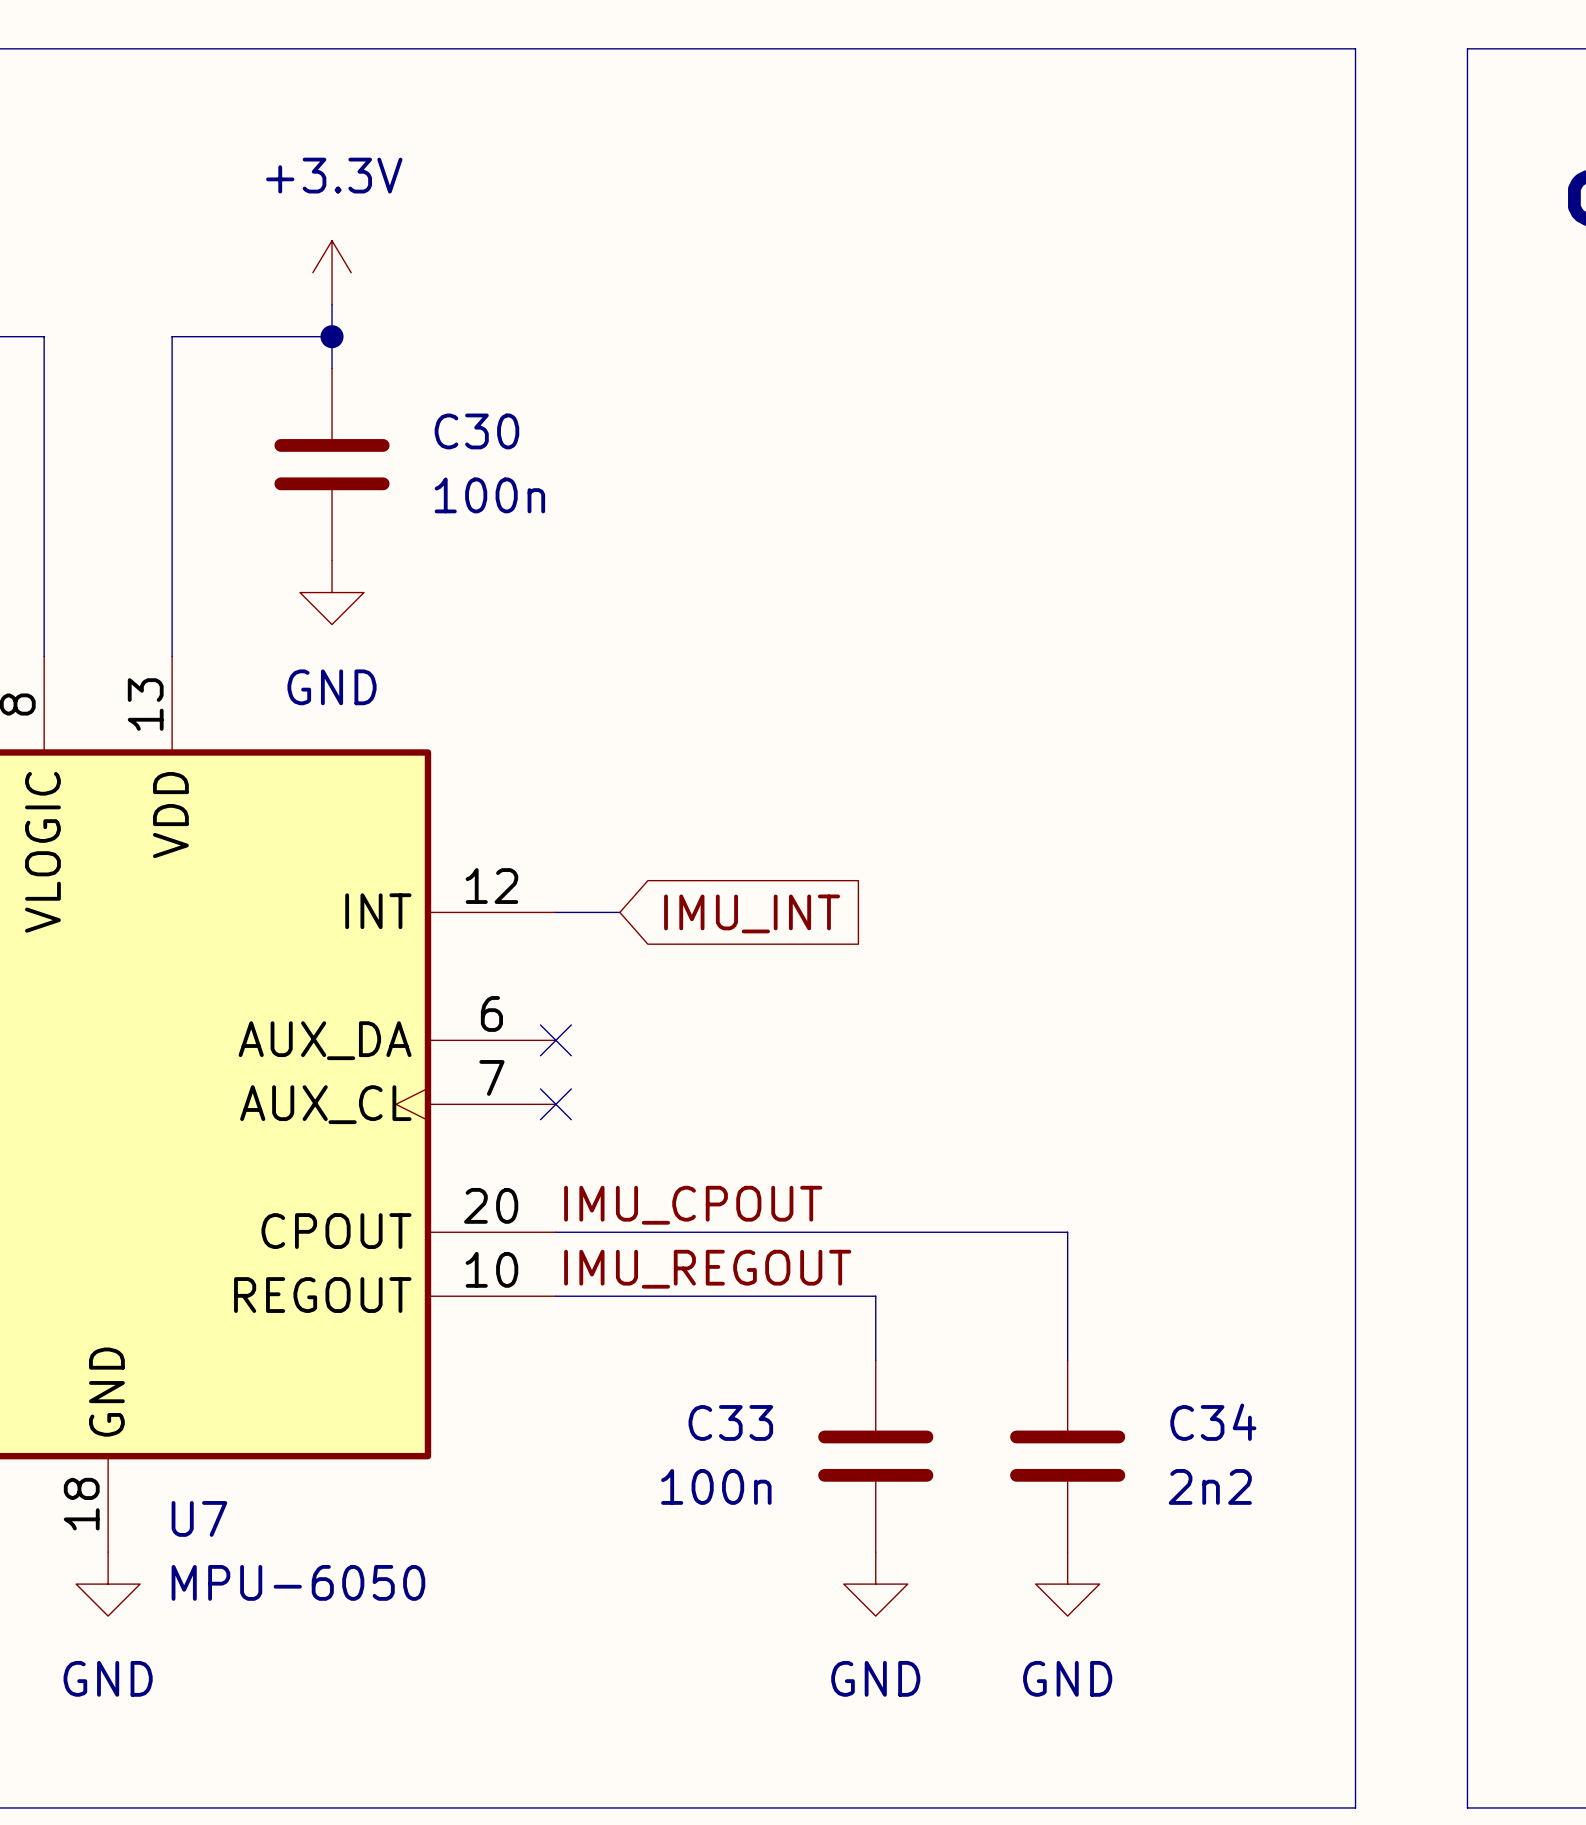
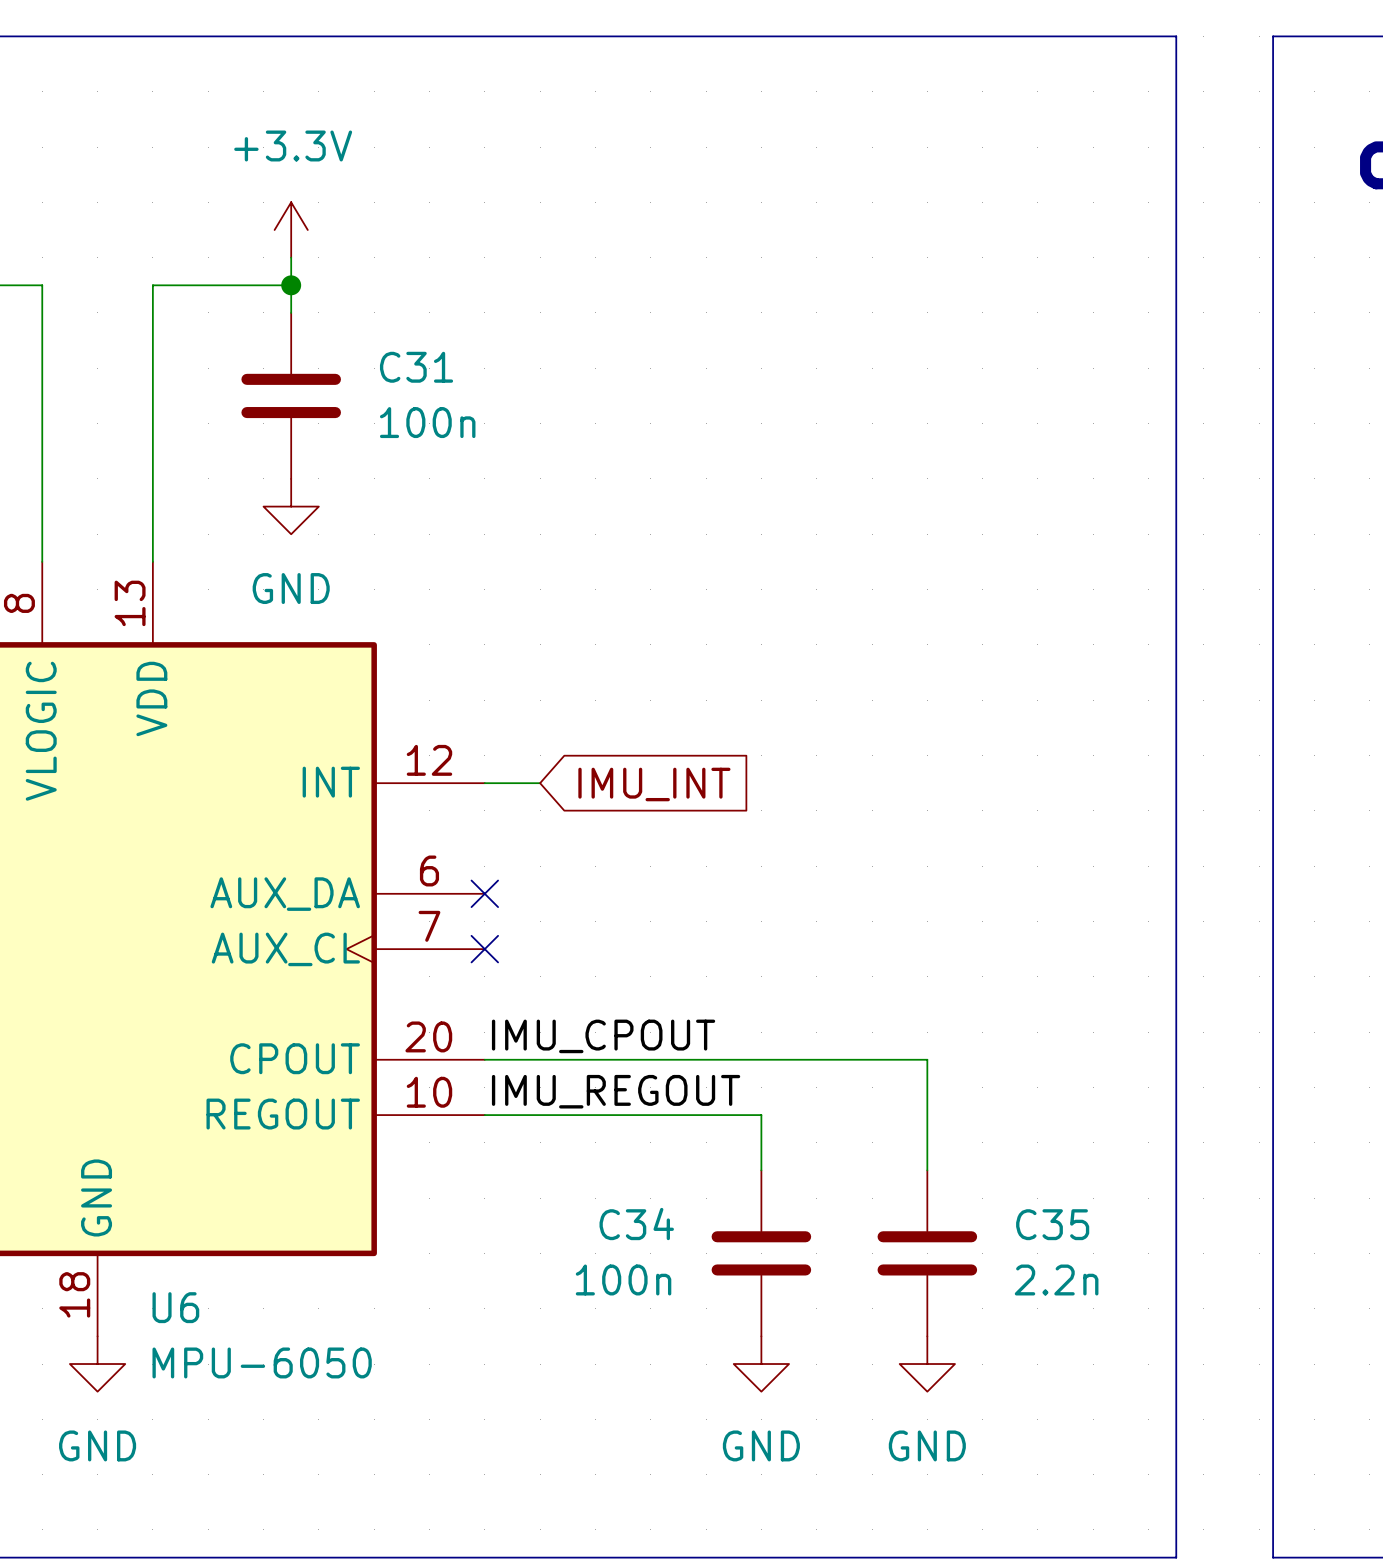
C30 name: C30 (476, 431) -> C31 (416, 367)
C33 name: C33 (730, 1422) -> C34 (636, 1224)
C34 name: C34 (1213, 1422) -> C35 (1052, 1224)
C34 value: 2n2 (1210, 1486) -> 2.2n (1056, 1279)
U7 name: U7 (199, 1518) -> U6 (175, 1307)

